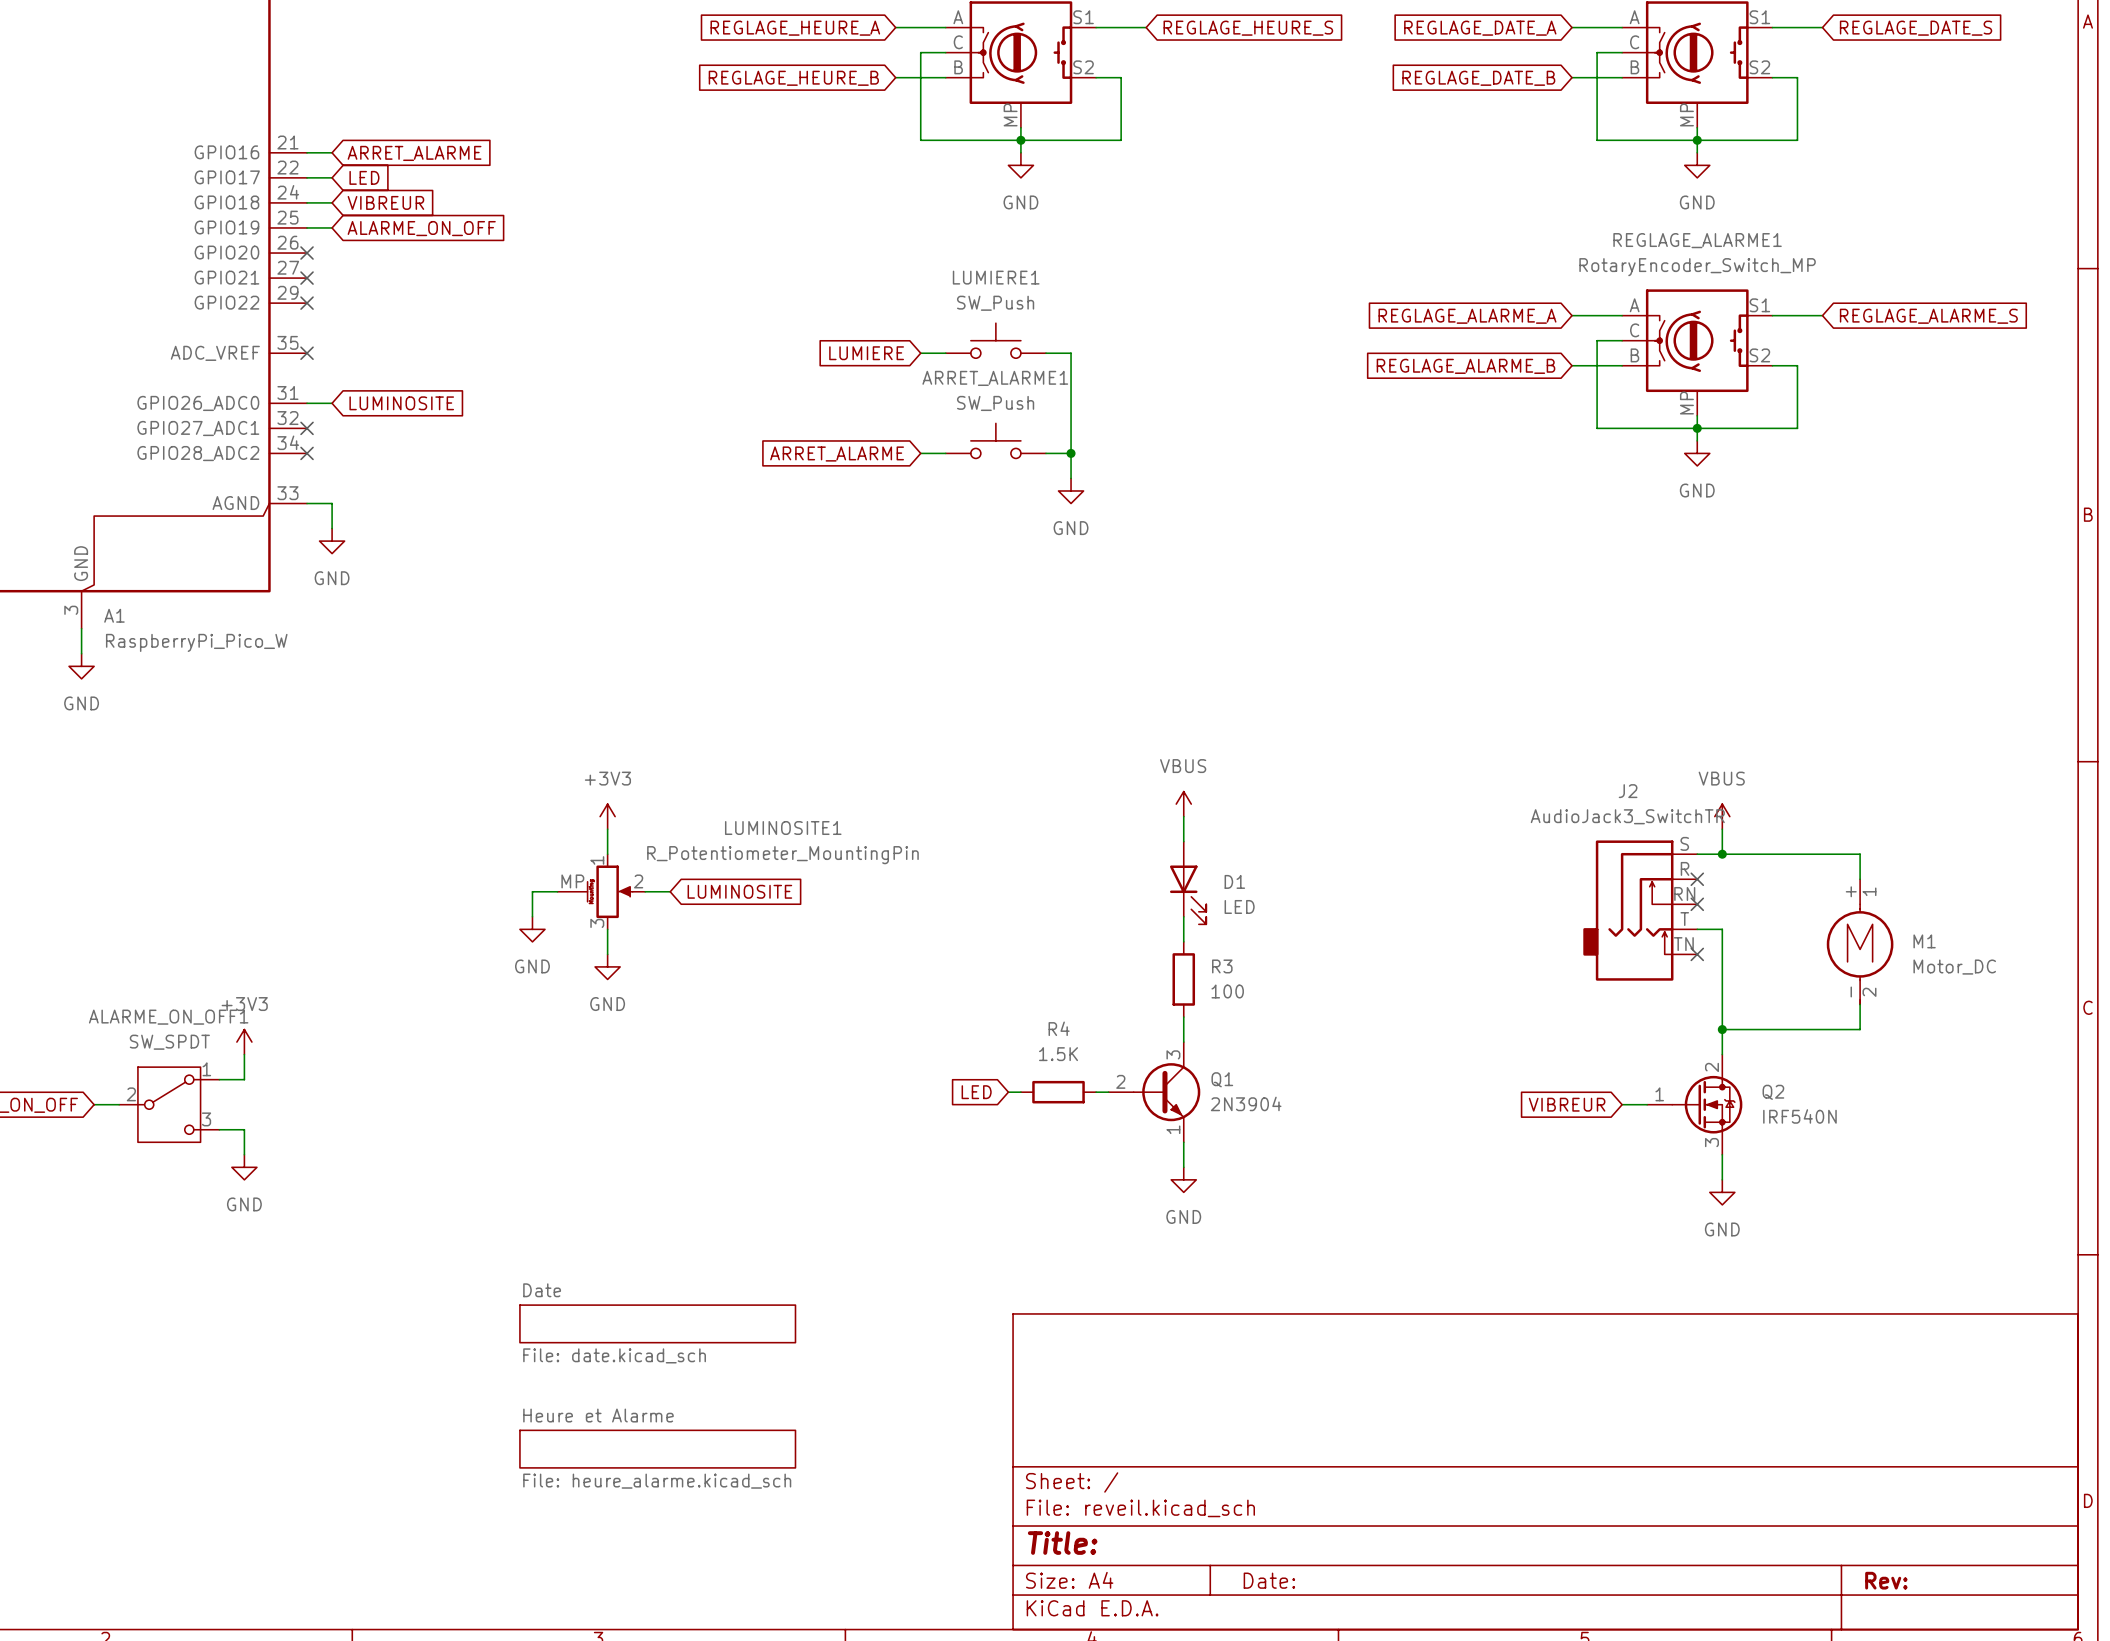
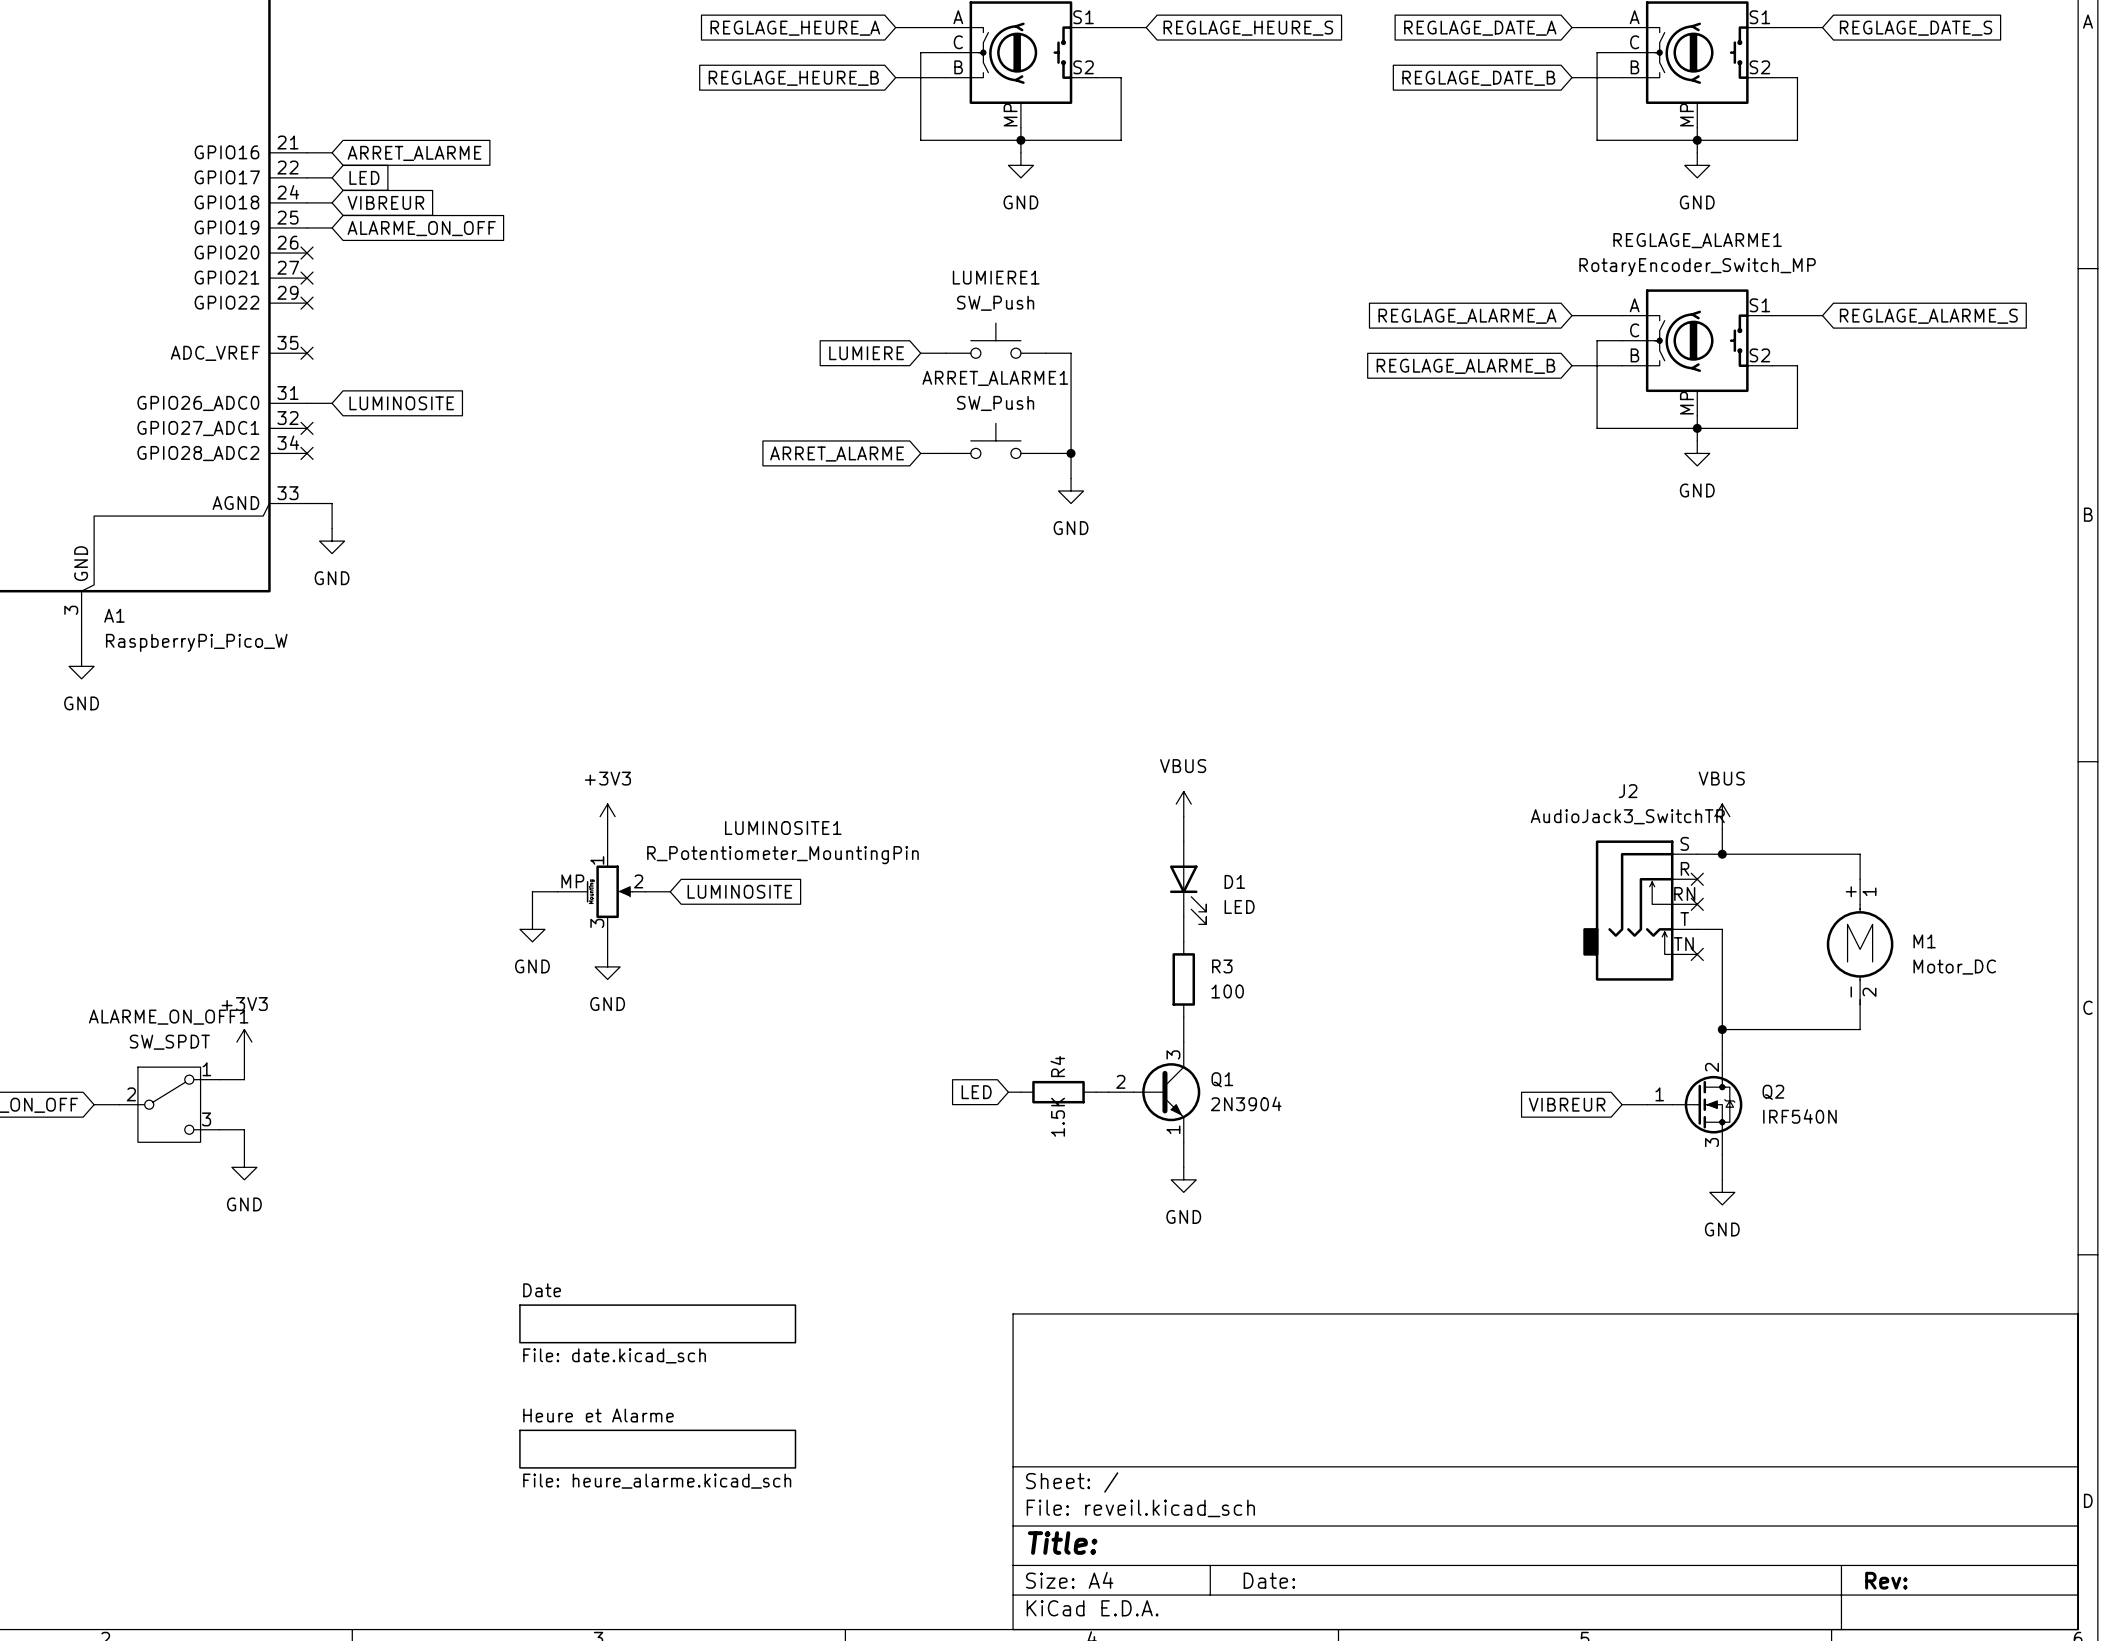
R4 name rotation: 0° (1059, 1028) -> 90° counterclockwise (1057, 1066)
R4 name position: R4 (1059, 1028) -> R4 (1057, 1066)
R4 value rotation: 0° (1058, 1054) -> 90° counterclockwise (1058, 1117)
R4 value position: 1.5K (1058, 1054) -> 1.5K (1058, 1117)

